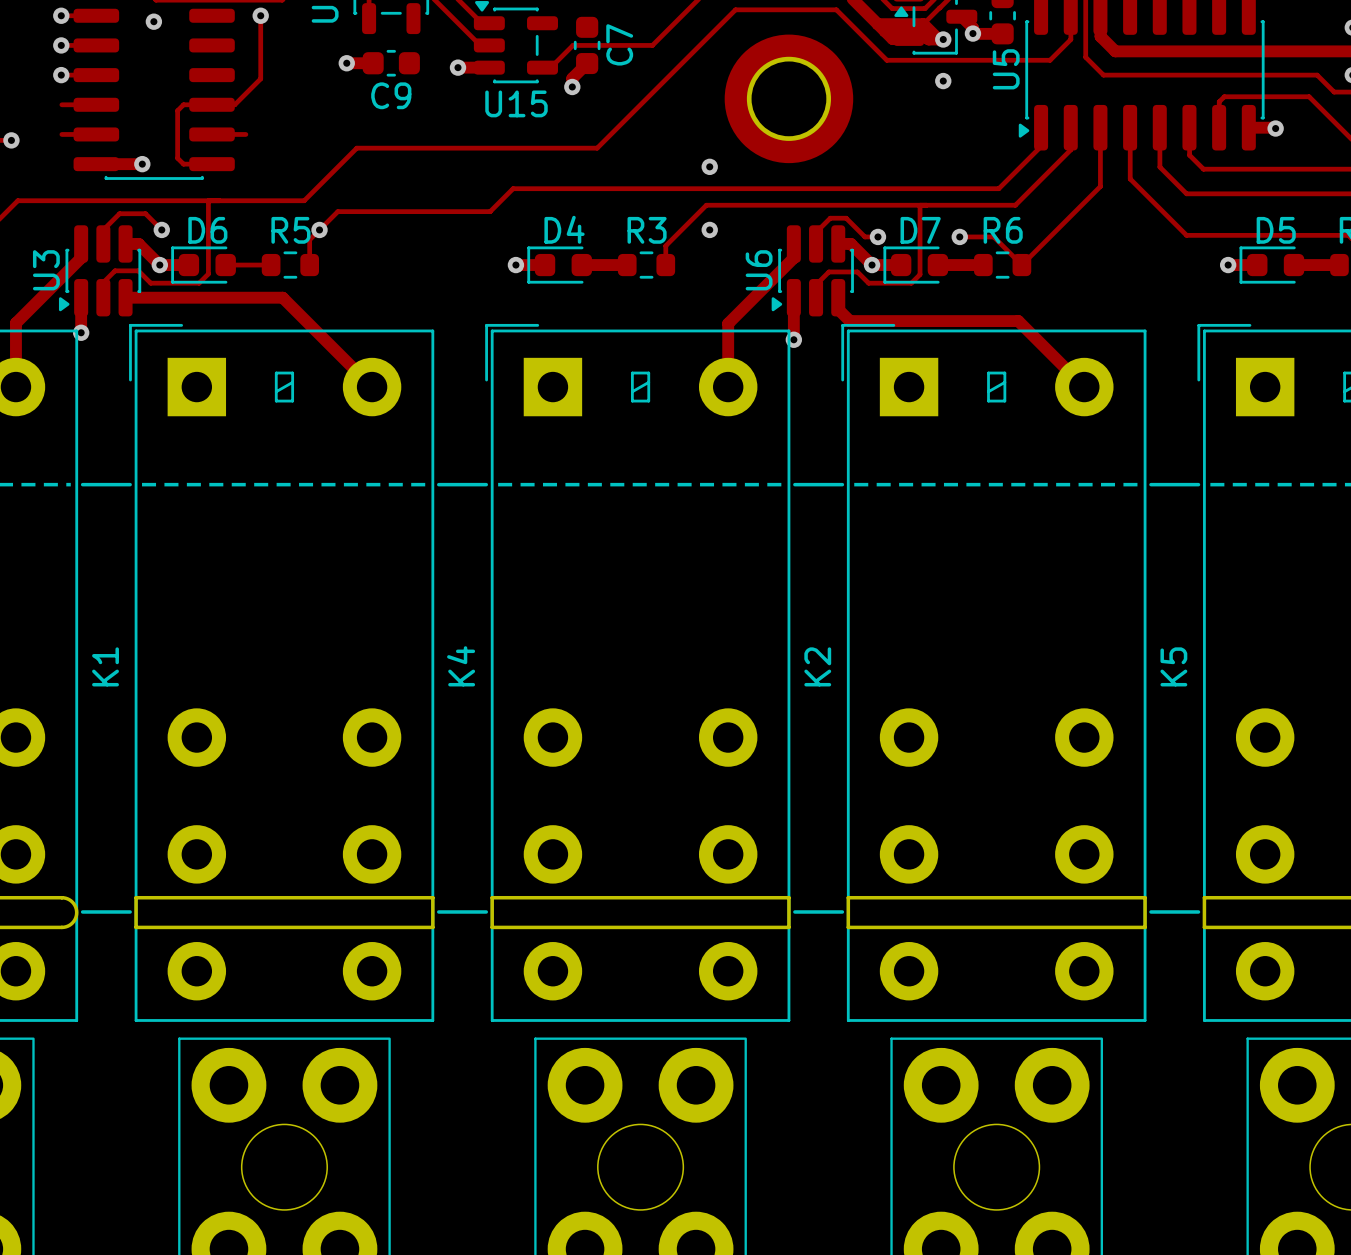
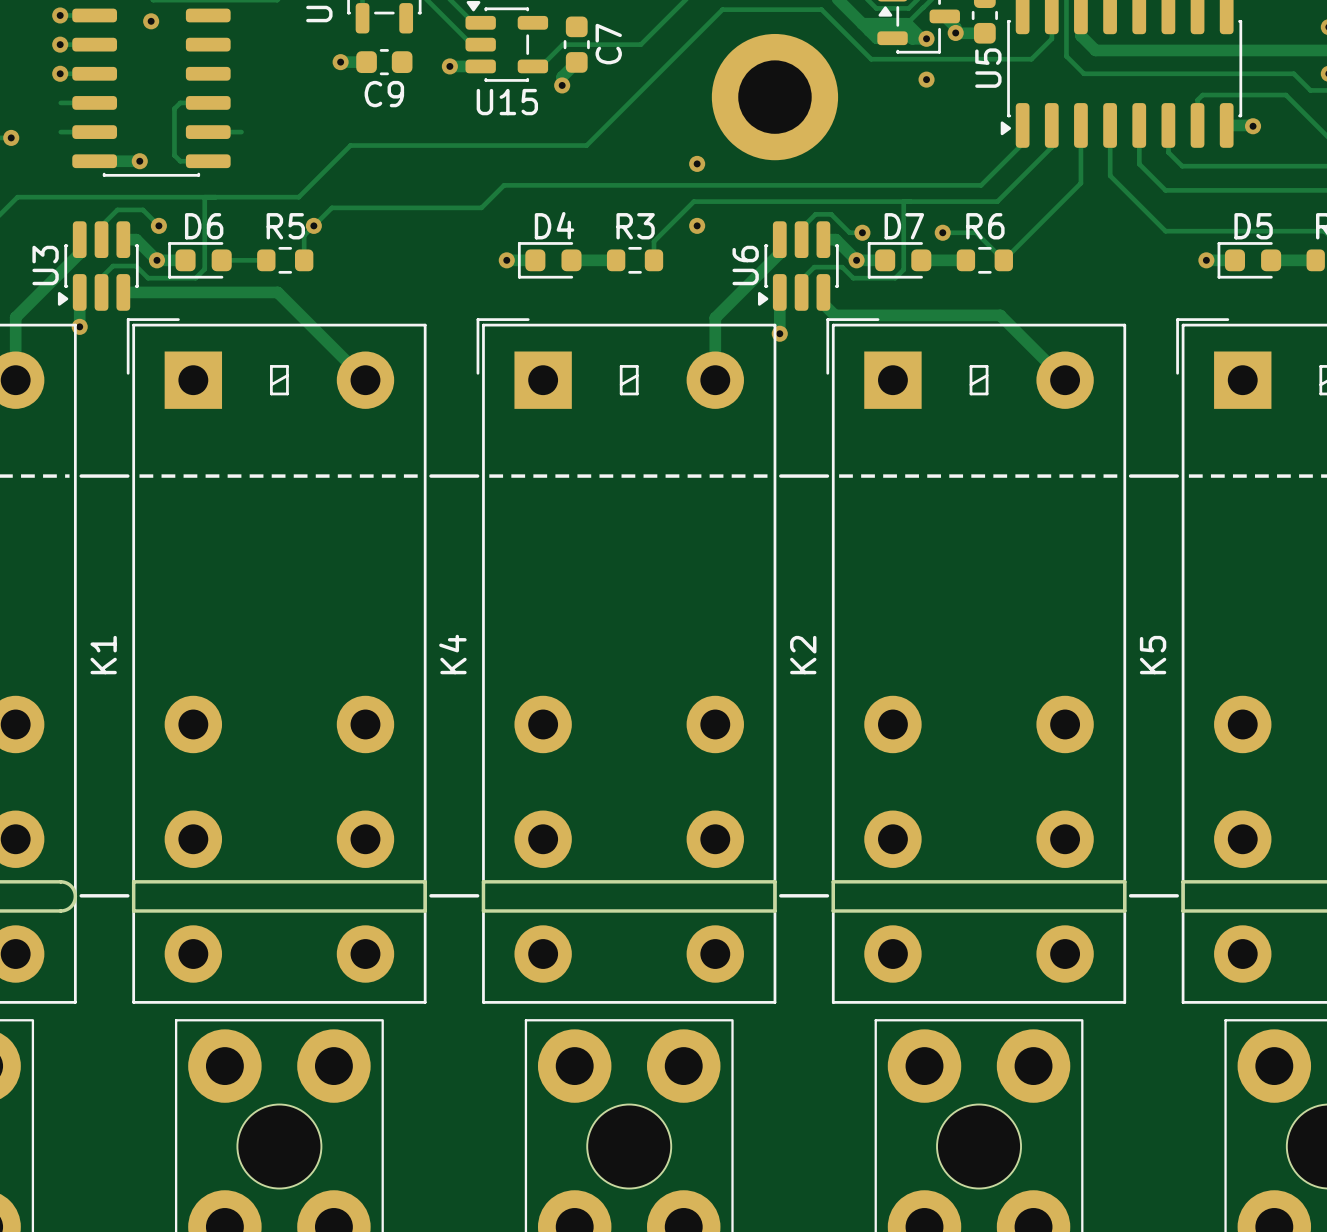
track: (260, 15) (260, 78) (234, 104) (212, 104) -> none
via: (260, 15) -> none

